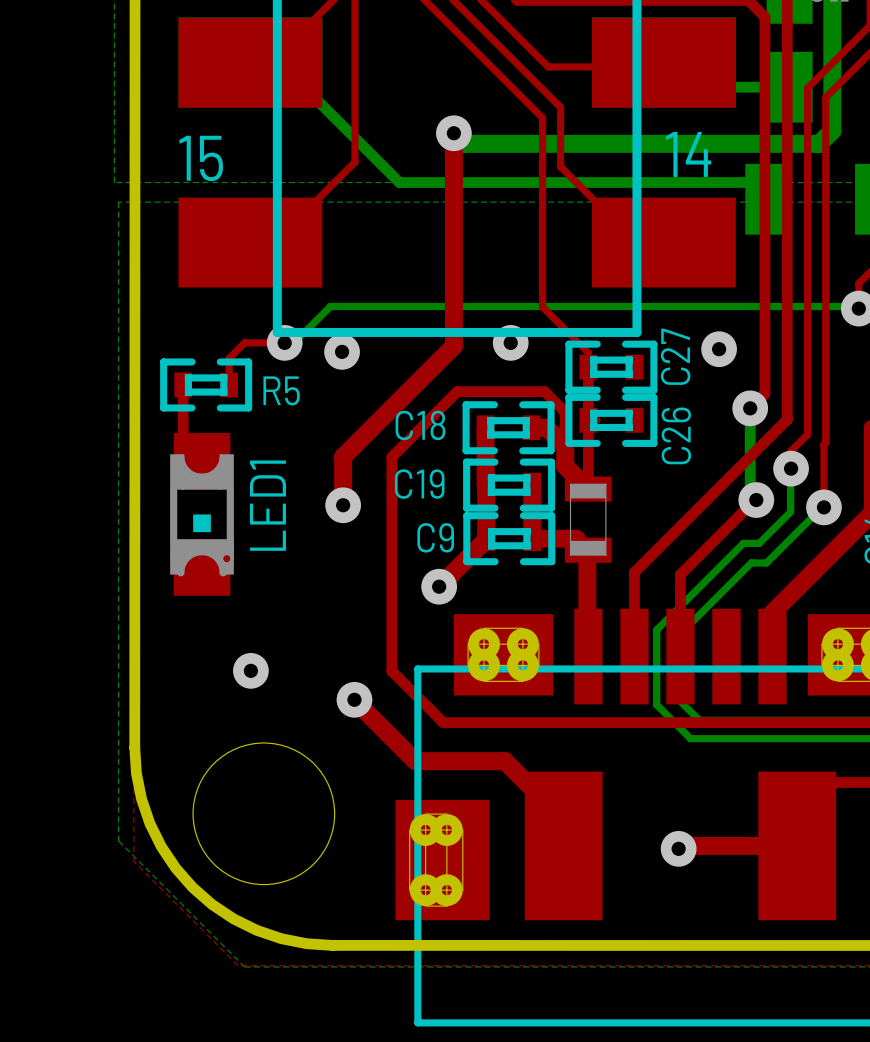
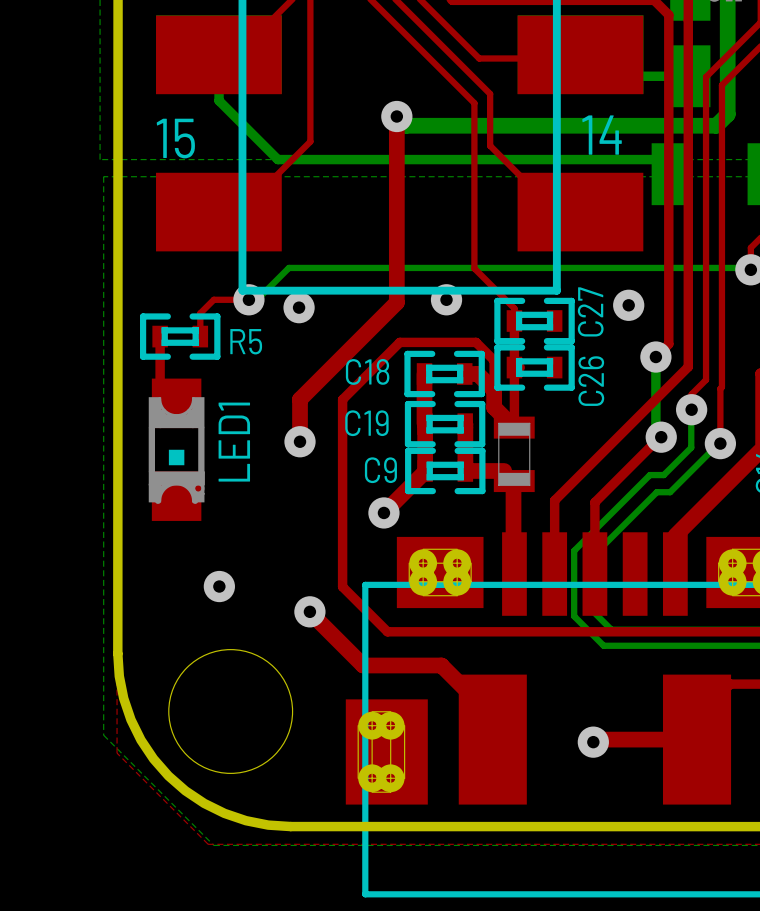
bottom track: (250, 62) (279, 62) (399, 182) -> (219, 54) (219, 100) (277, 159) (349, 159)

